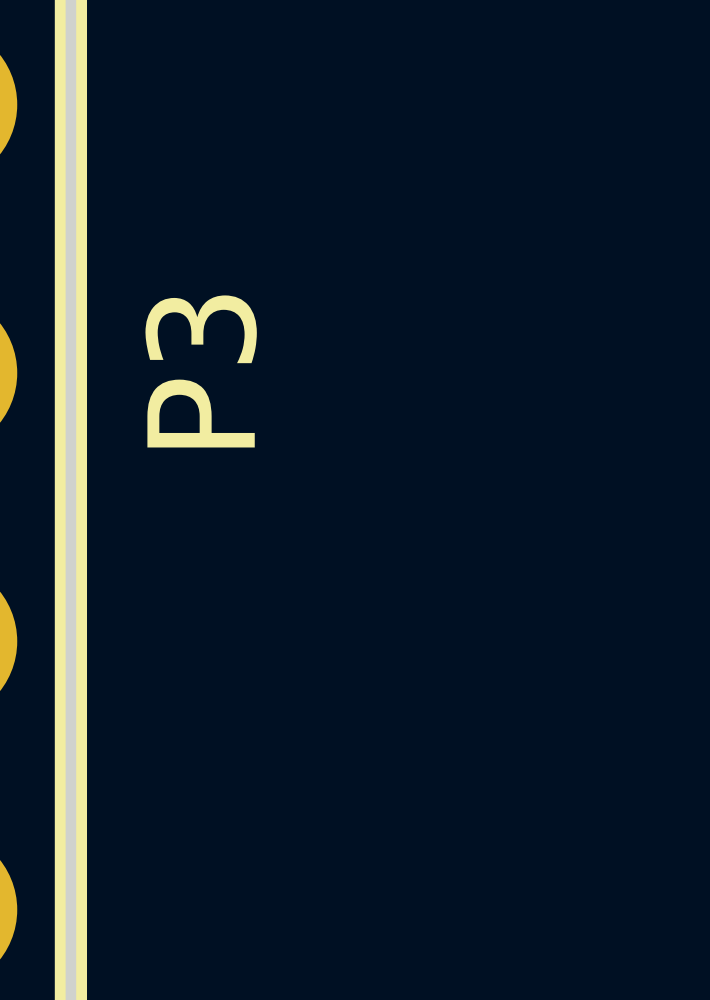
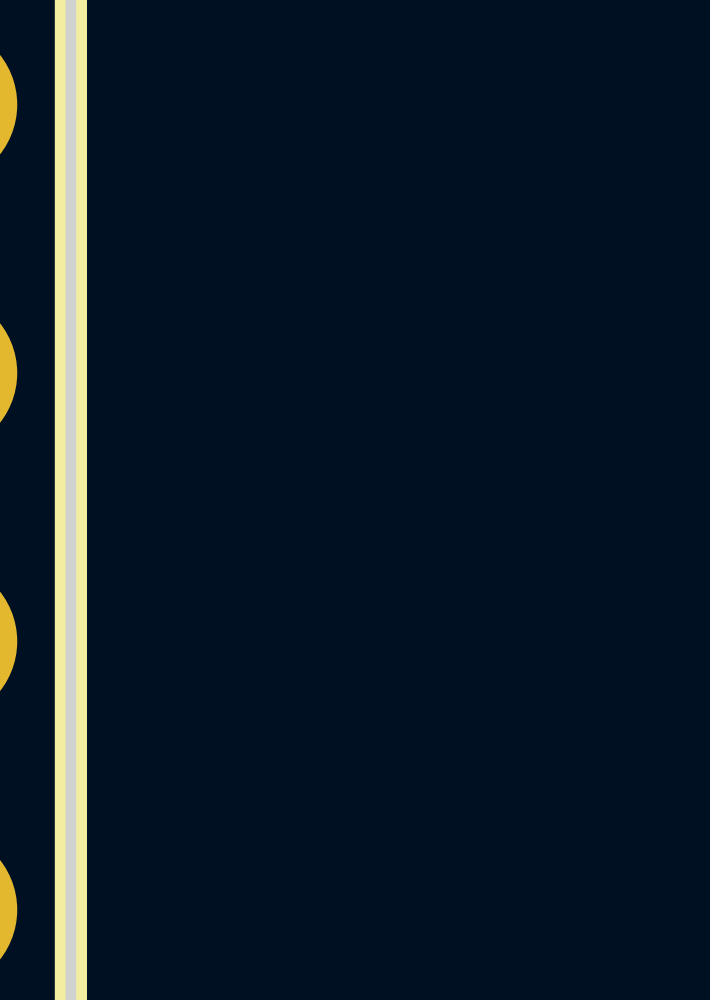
P3 name: P3 (201, 371) -> none

